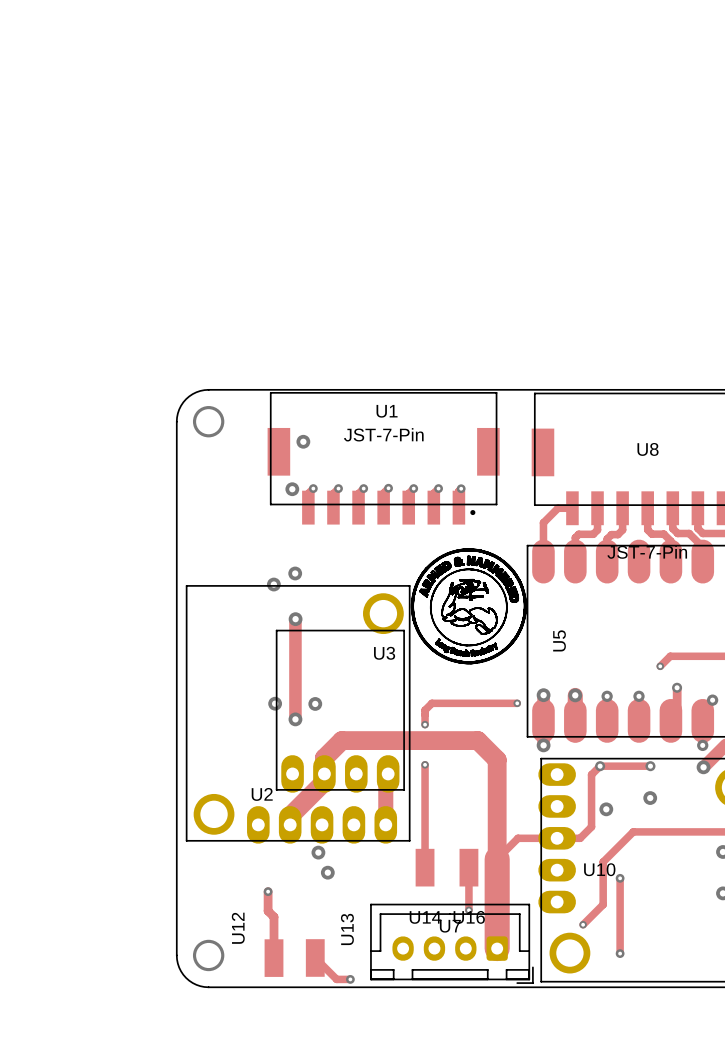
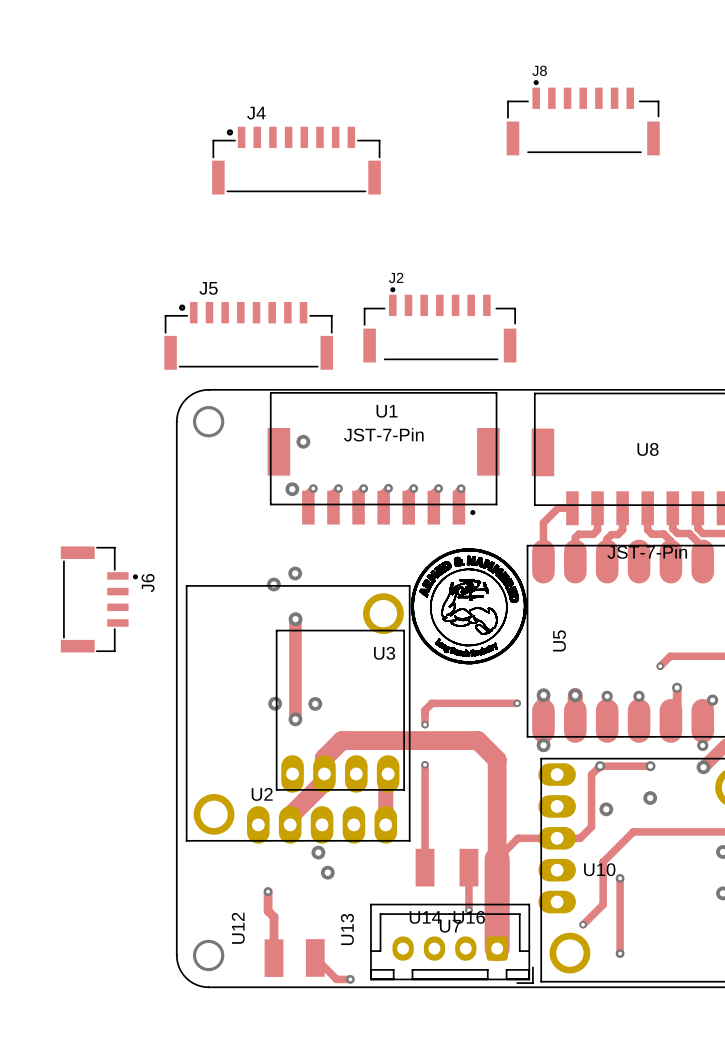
J8: none -> (583, 117)
J4: none -> (296, 160)
J2: none -> (439, 324)
J5: none -> (248, 335)
J6: none -> (99, 599)

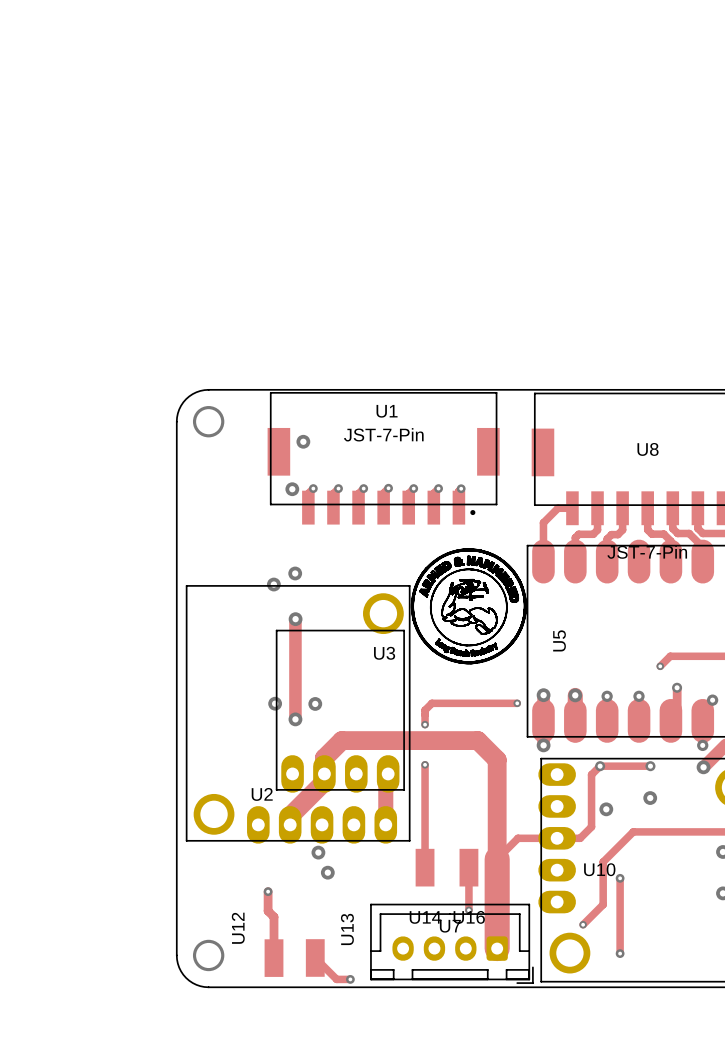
J8: (583, 117) -> none
J4: (296, 160) -> none
J2: (439, 324) -> none
J5: (248, 335) -> none
J6: (99, 599) -> none

